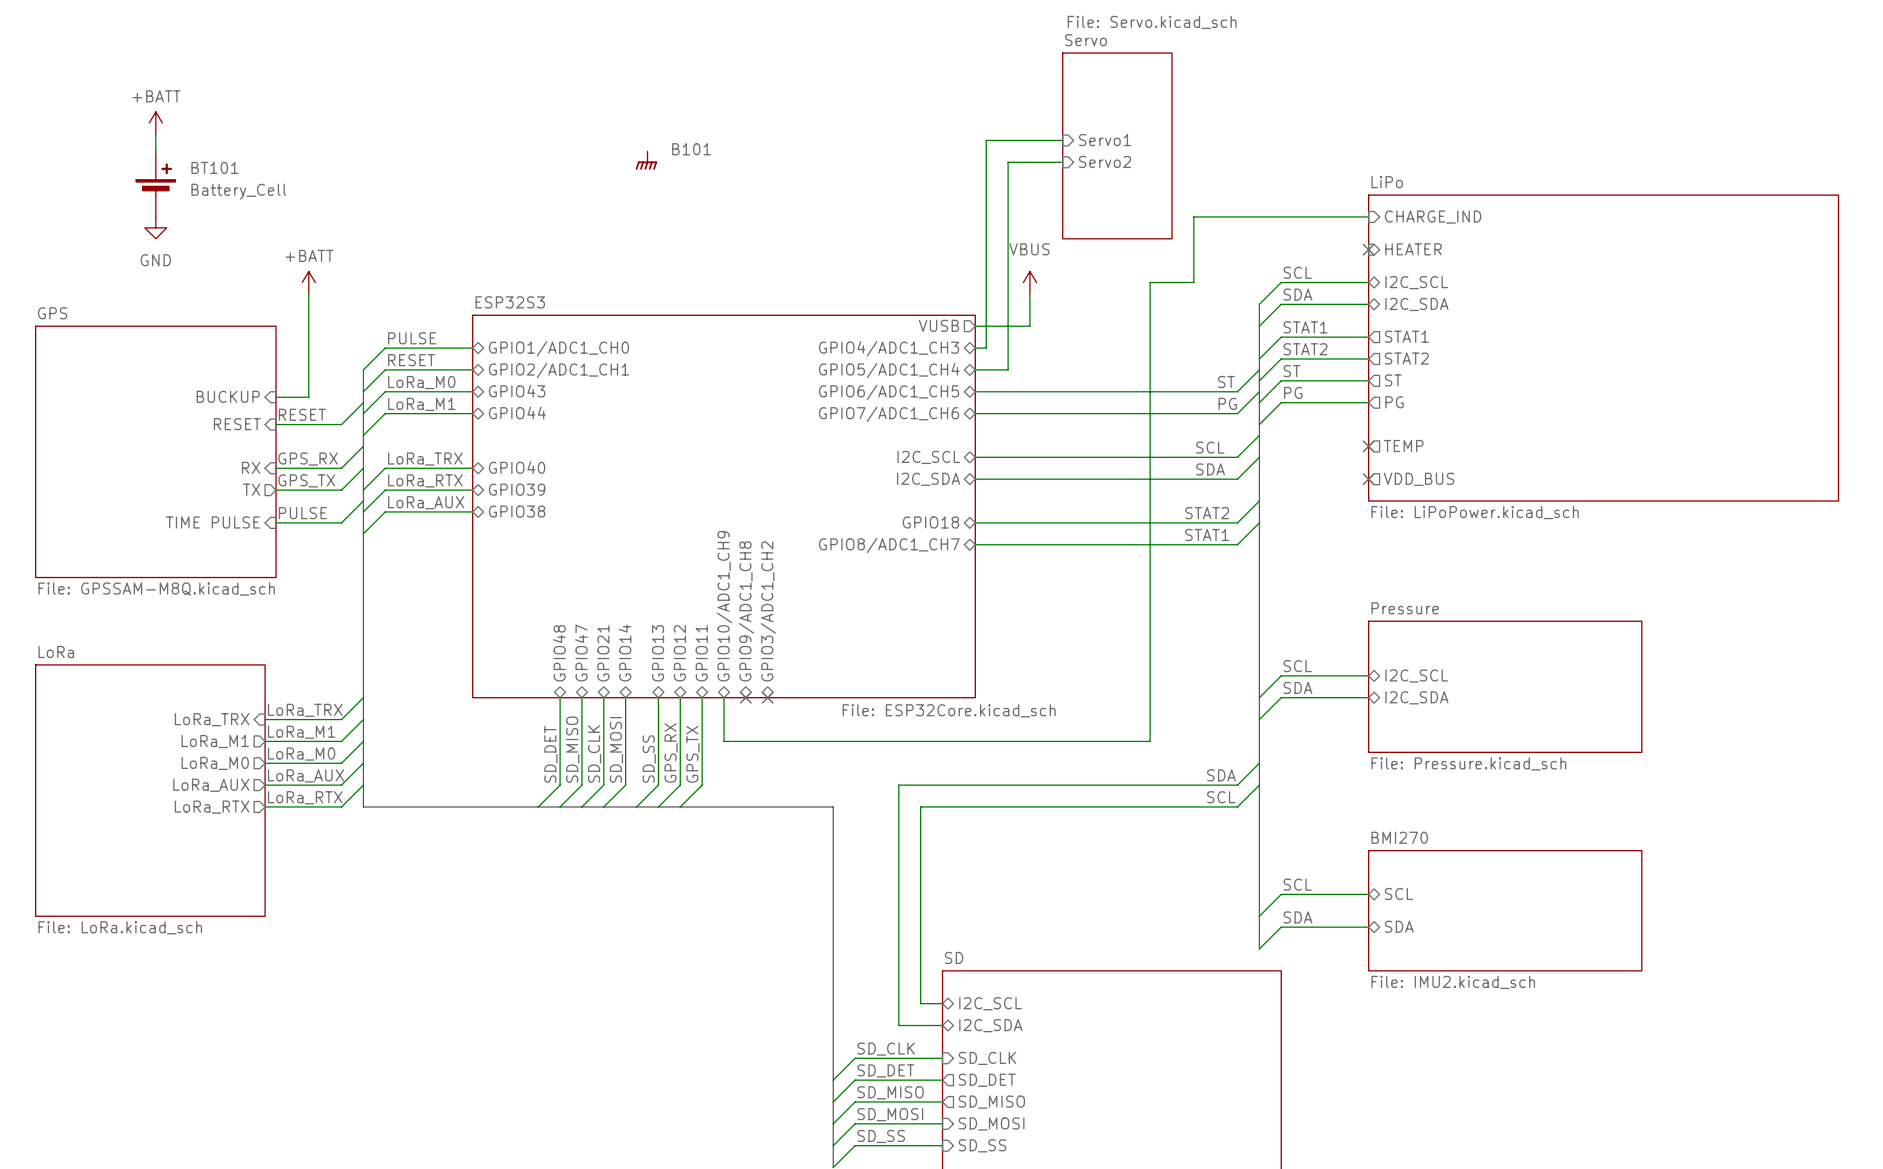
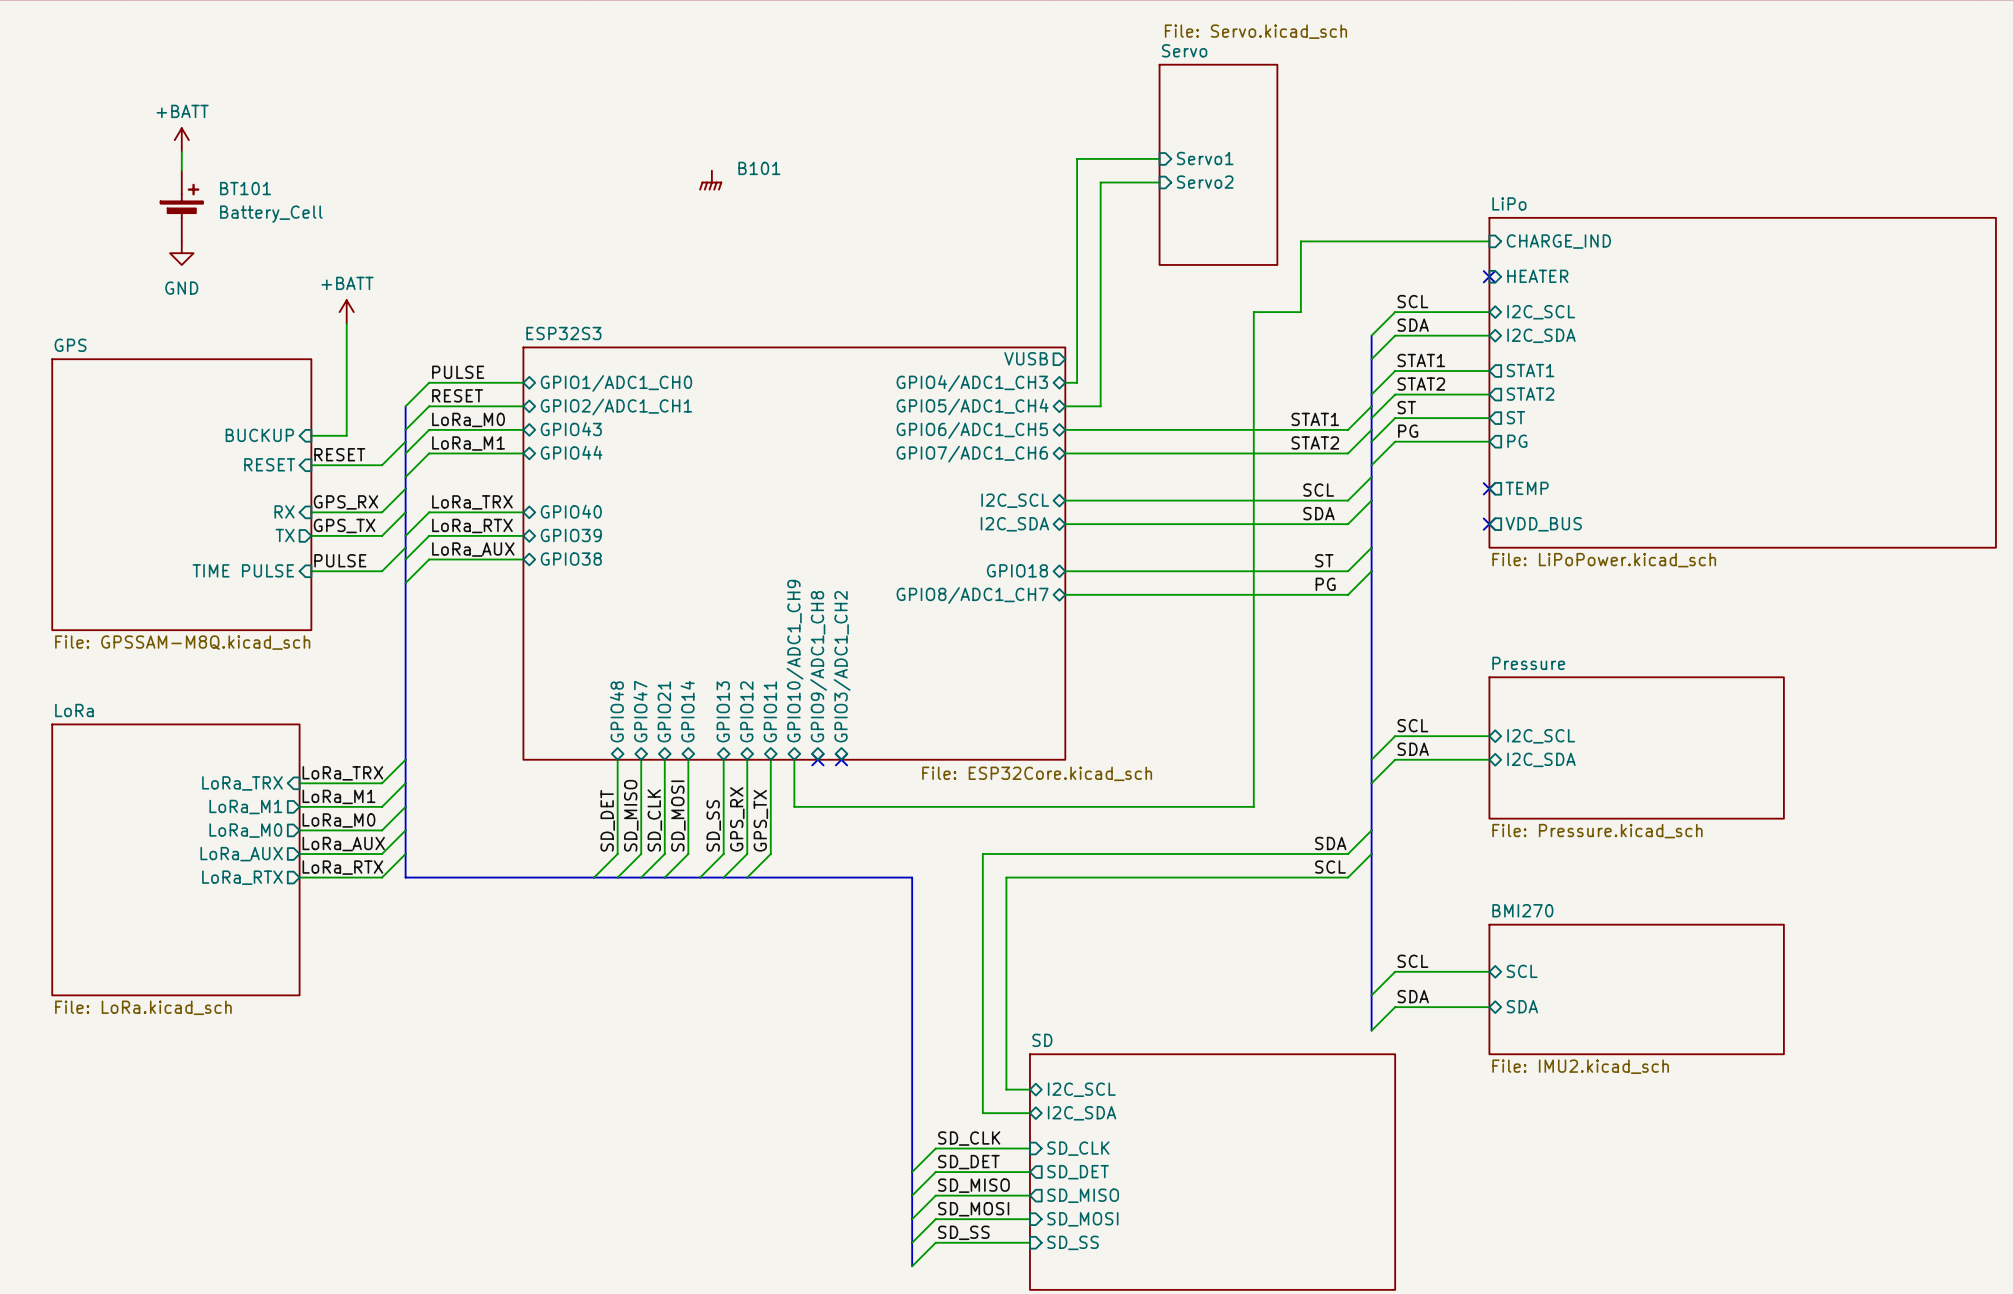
power symbol: VBUS (1029, 282) -> none
wire: (1029, 293) (1029, 326) (975, 326) -> none
label position: ST (1226, 382) -> ST (1324, 560)
label position: PG (1227, 403) -> PG (1325, 584)
label position: STAT2 (1207, 513) -> STAT2 (1315, 442)
label position: STAT1 (1207, 534) -> STAT1 (1315, 419)

